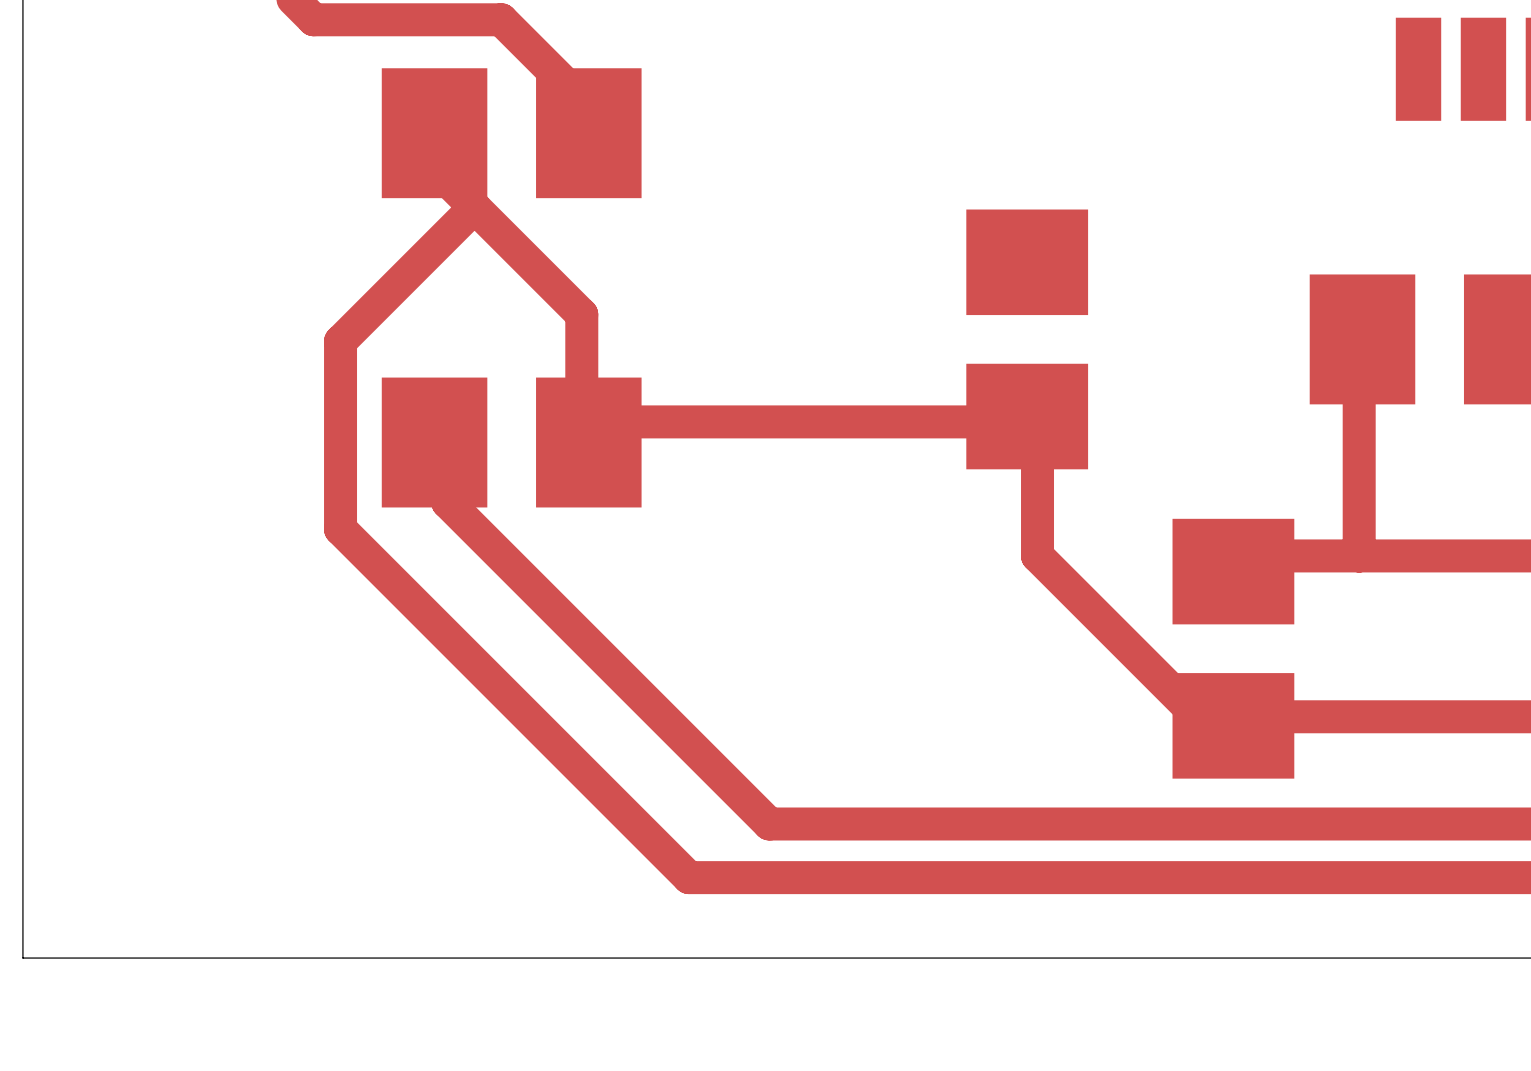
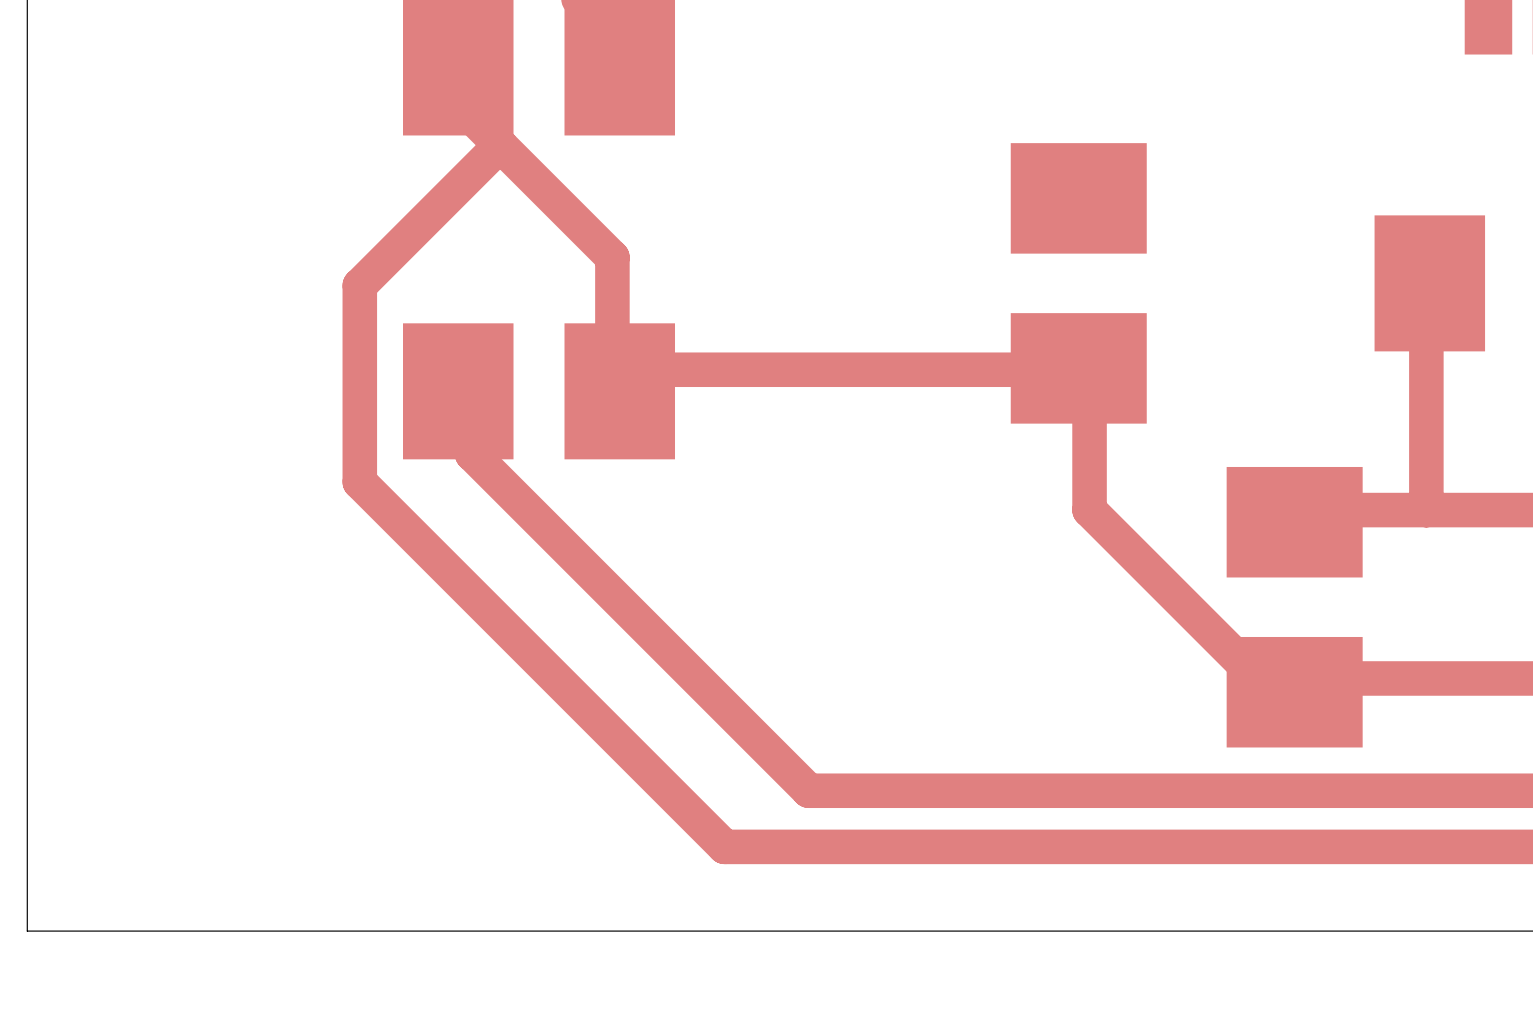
part footprint: [966, 209, 1089, 470] -> [1010, 143, 1147, 424]
part footprint: [1172, 518, 1295, 779] -> [1226, 466, 1363, 748]

